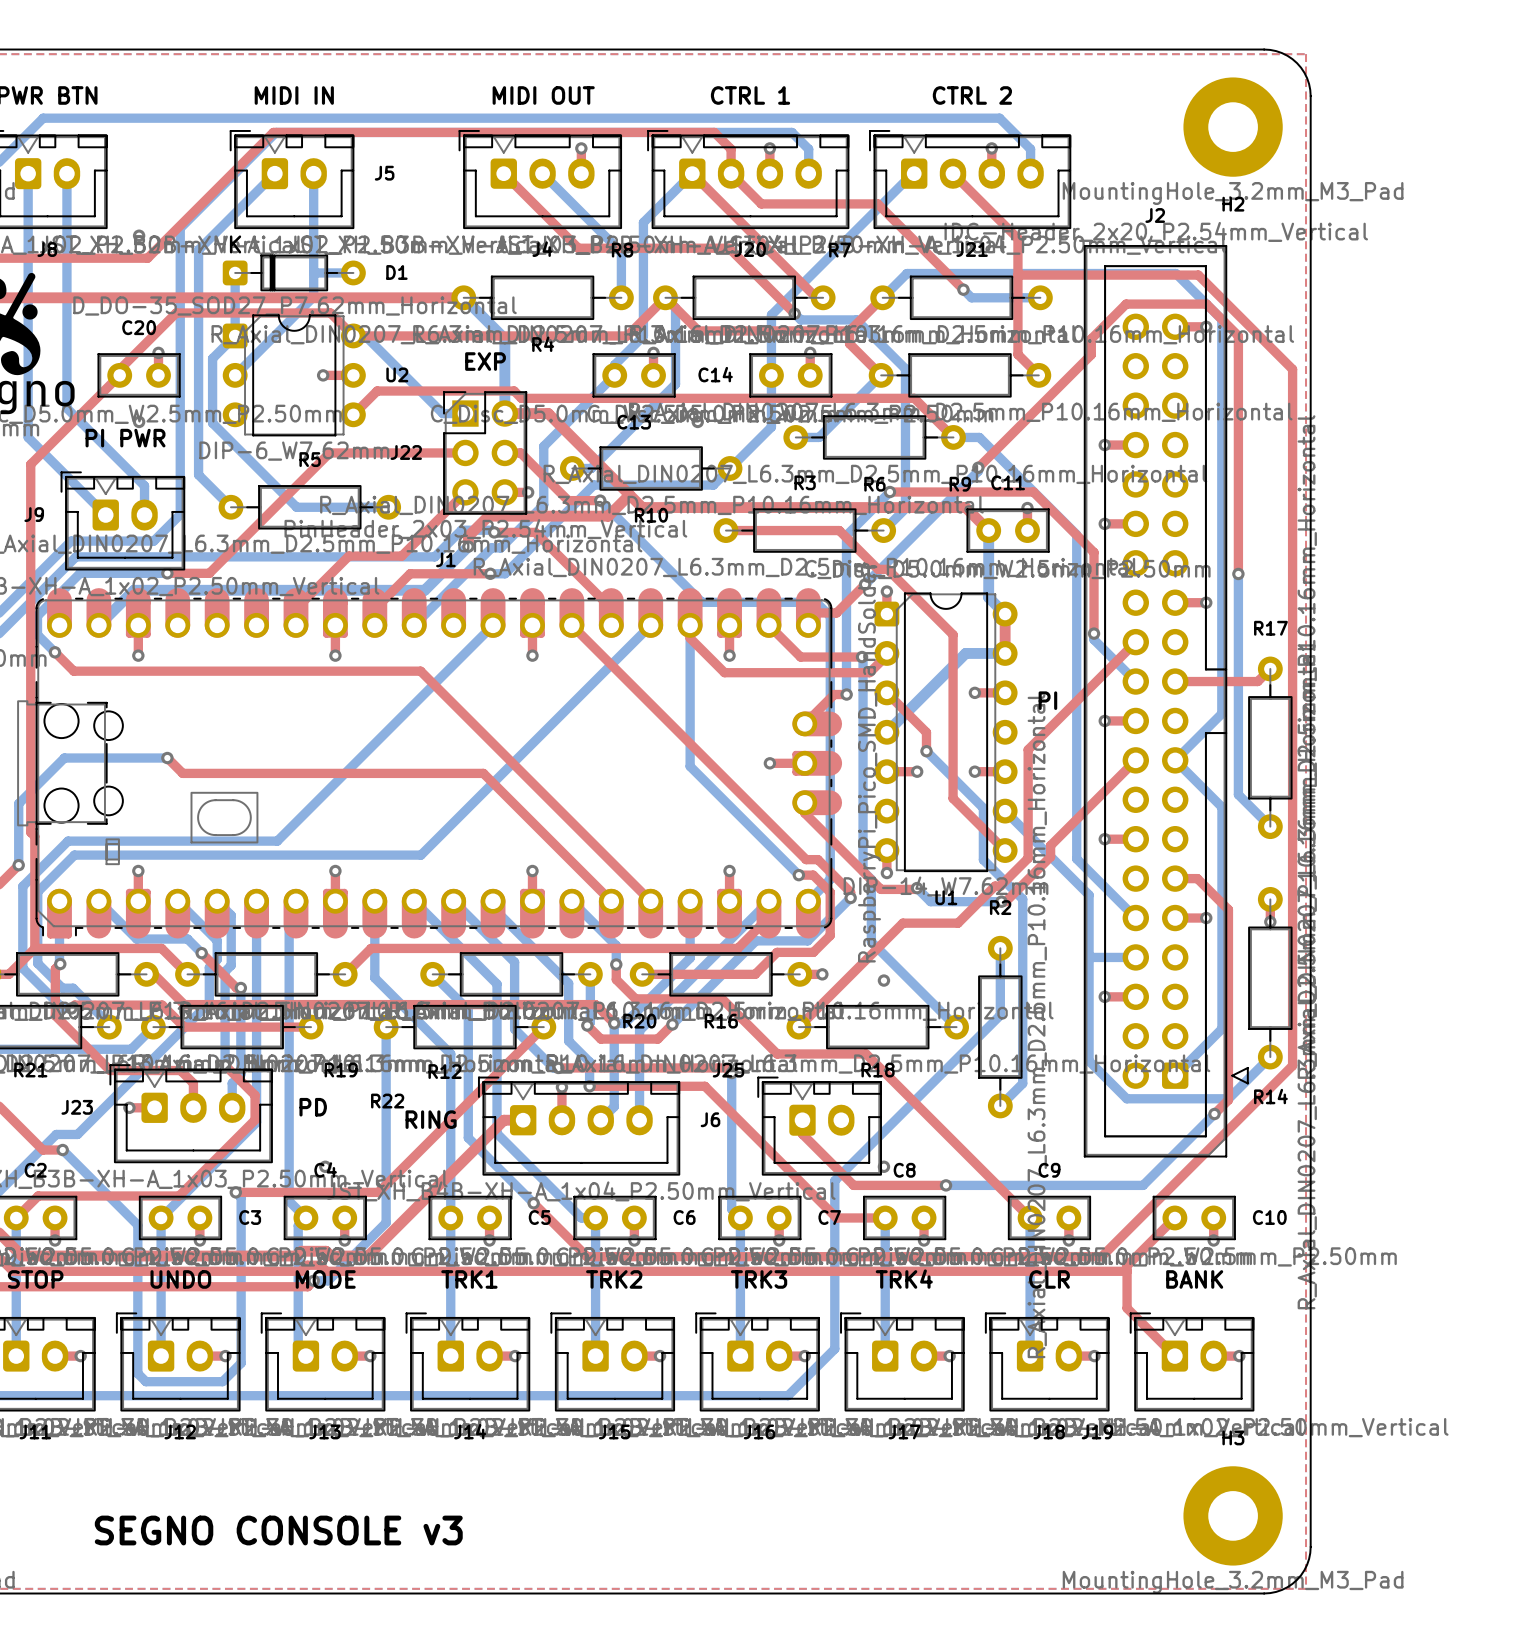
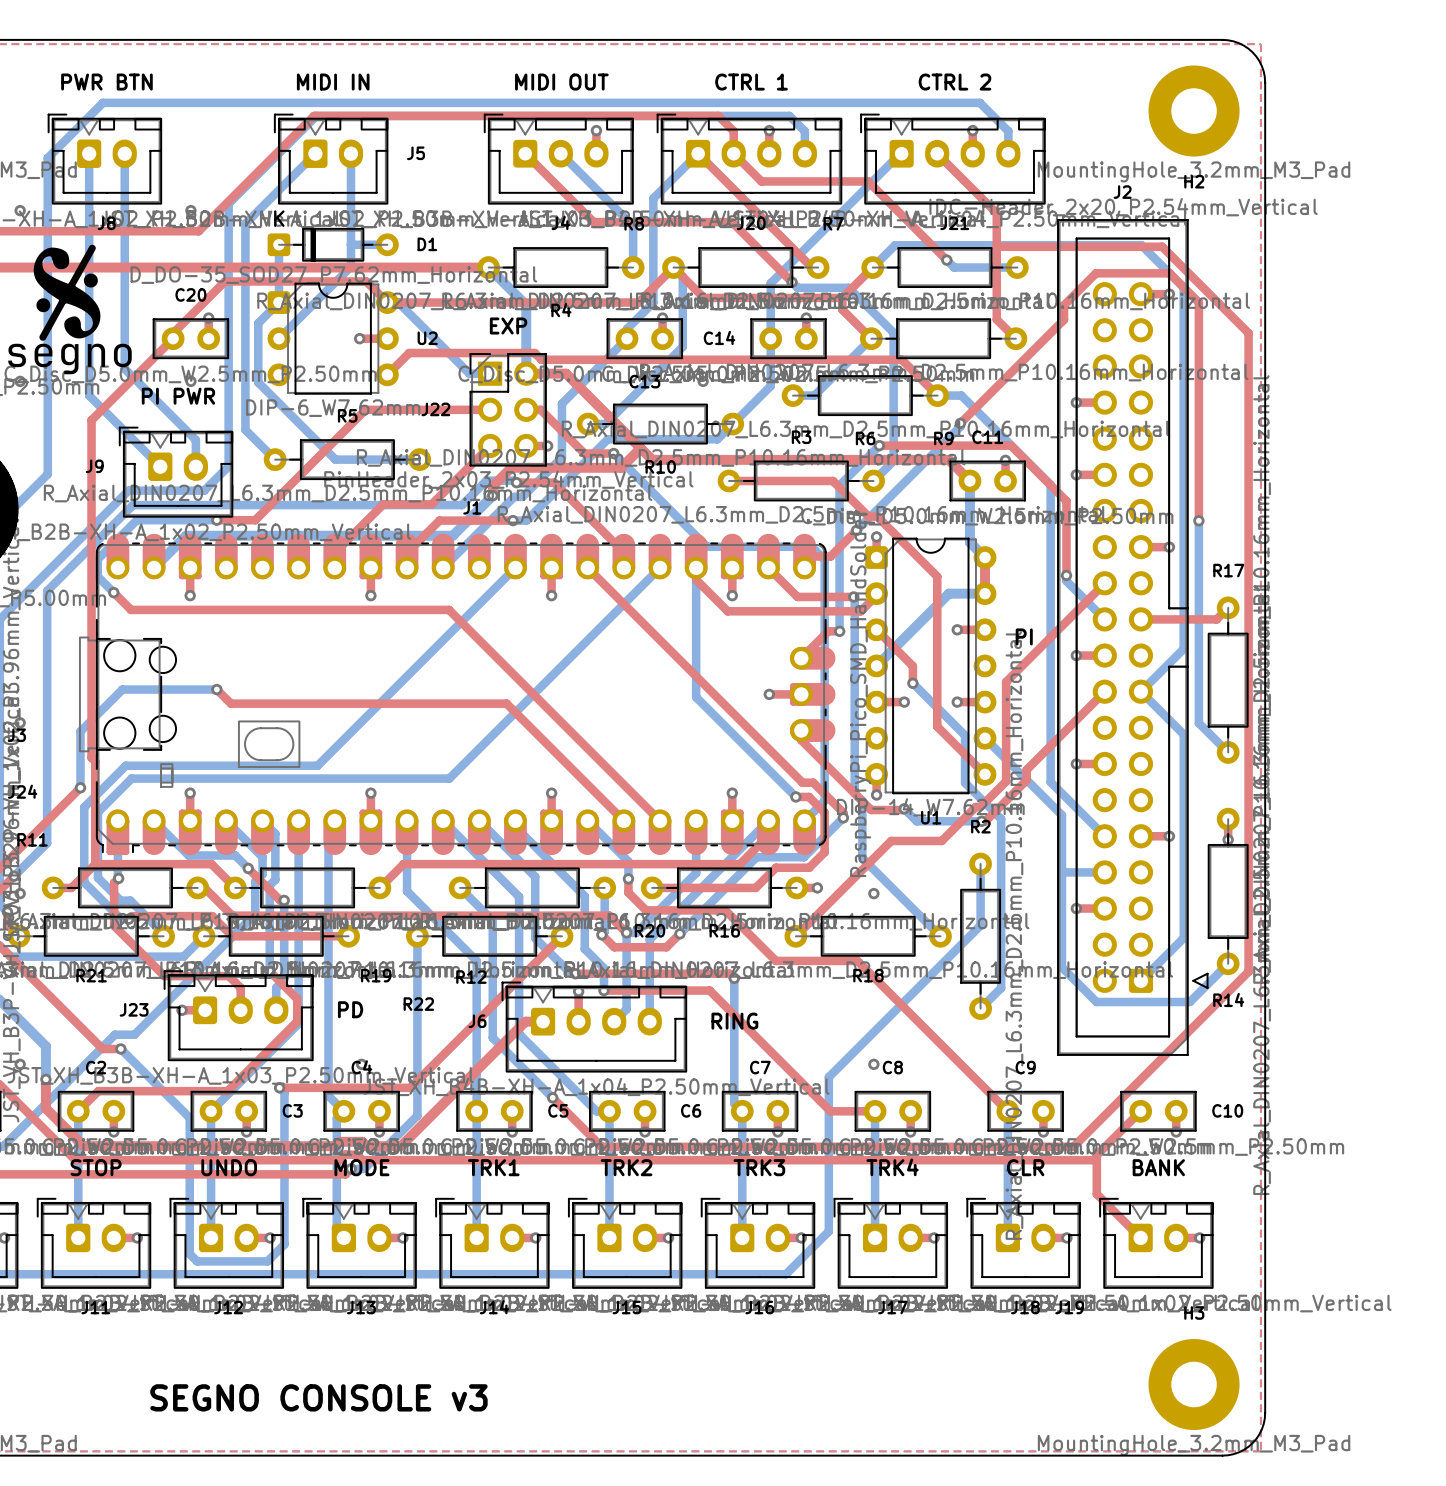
top track: (1175, 878) (1197, 878) (1228, 909) (1228, 1100) (1214, 1114) -> none
bottom track: (1214, 1114) (1143, 1185) (946, 1185) -> none
via: (1214, 1114) -> none
text position: RING (431, 1119) -> RING (734, 1021)
J6 name position: J6 (710, 1119) -> J6 (477, 1021)
top track: (802, 1120) (802, 1134) (853, 1185) (946, 1185) -> none
J25: (819, 1126) -> none
via: (946, 1185) -> none
C7 name position: C7 (829, 1217) -> C7 (760, 1067)

